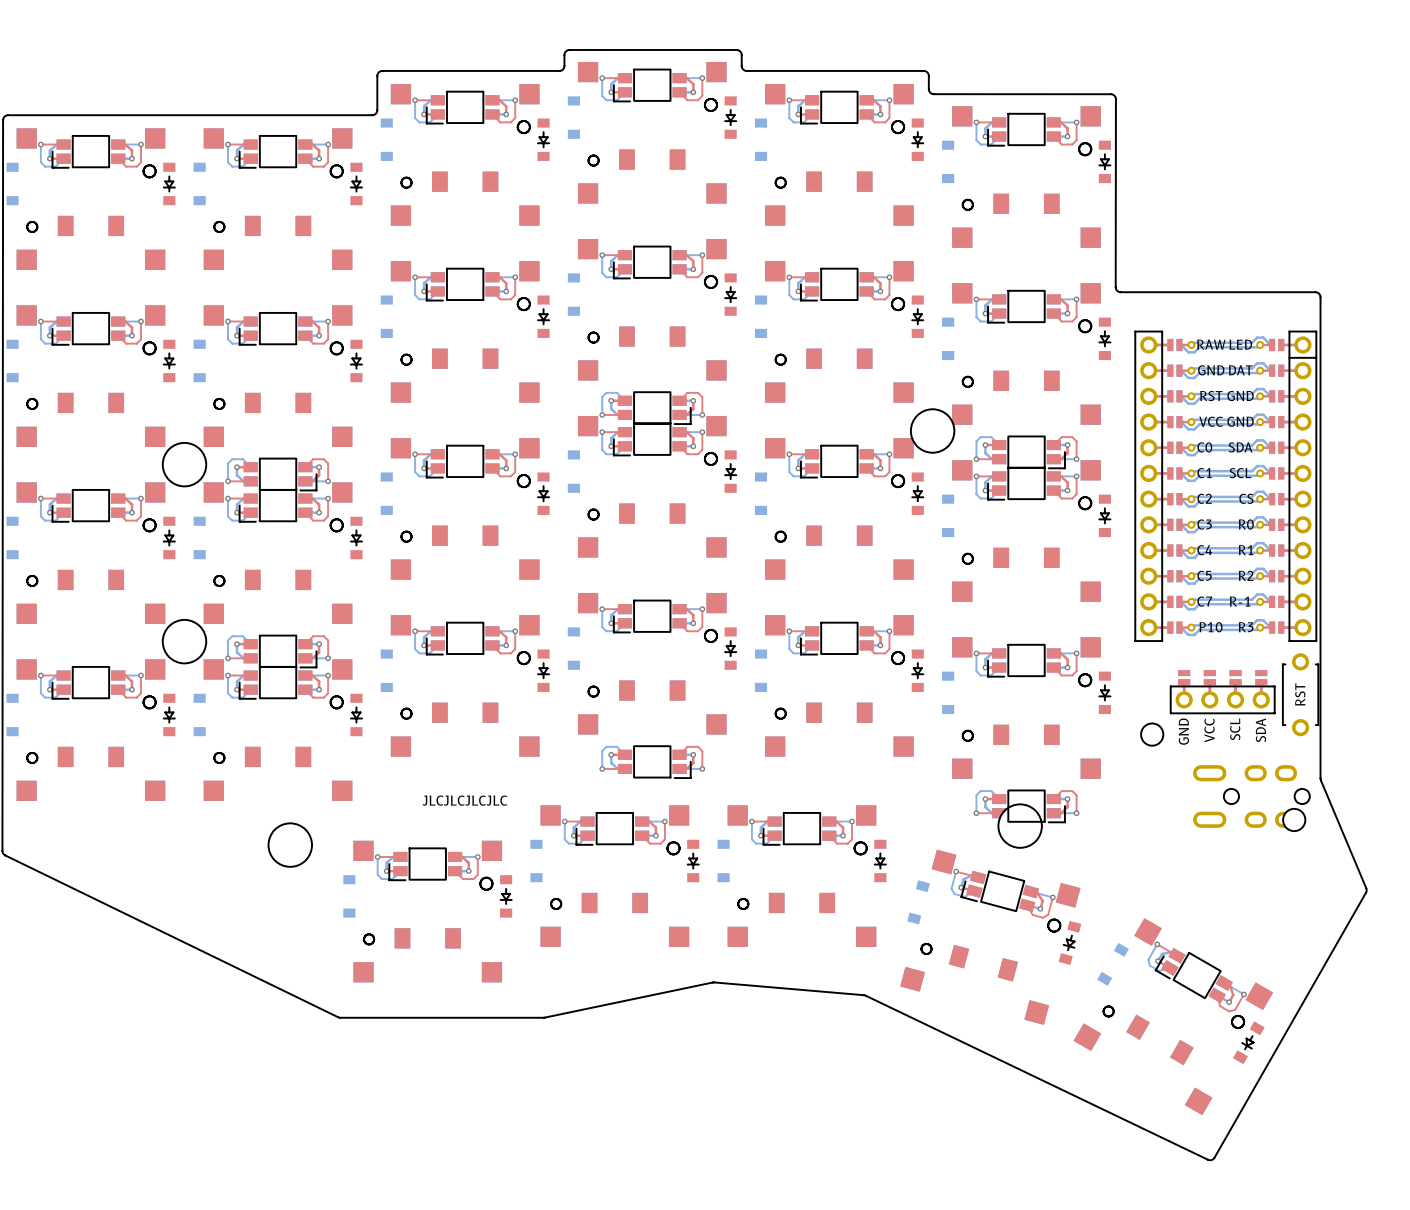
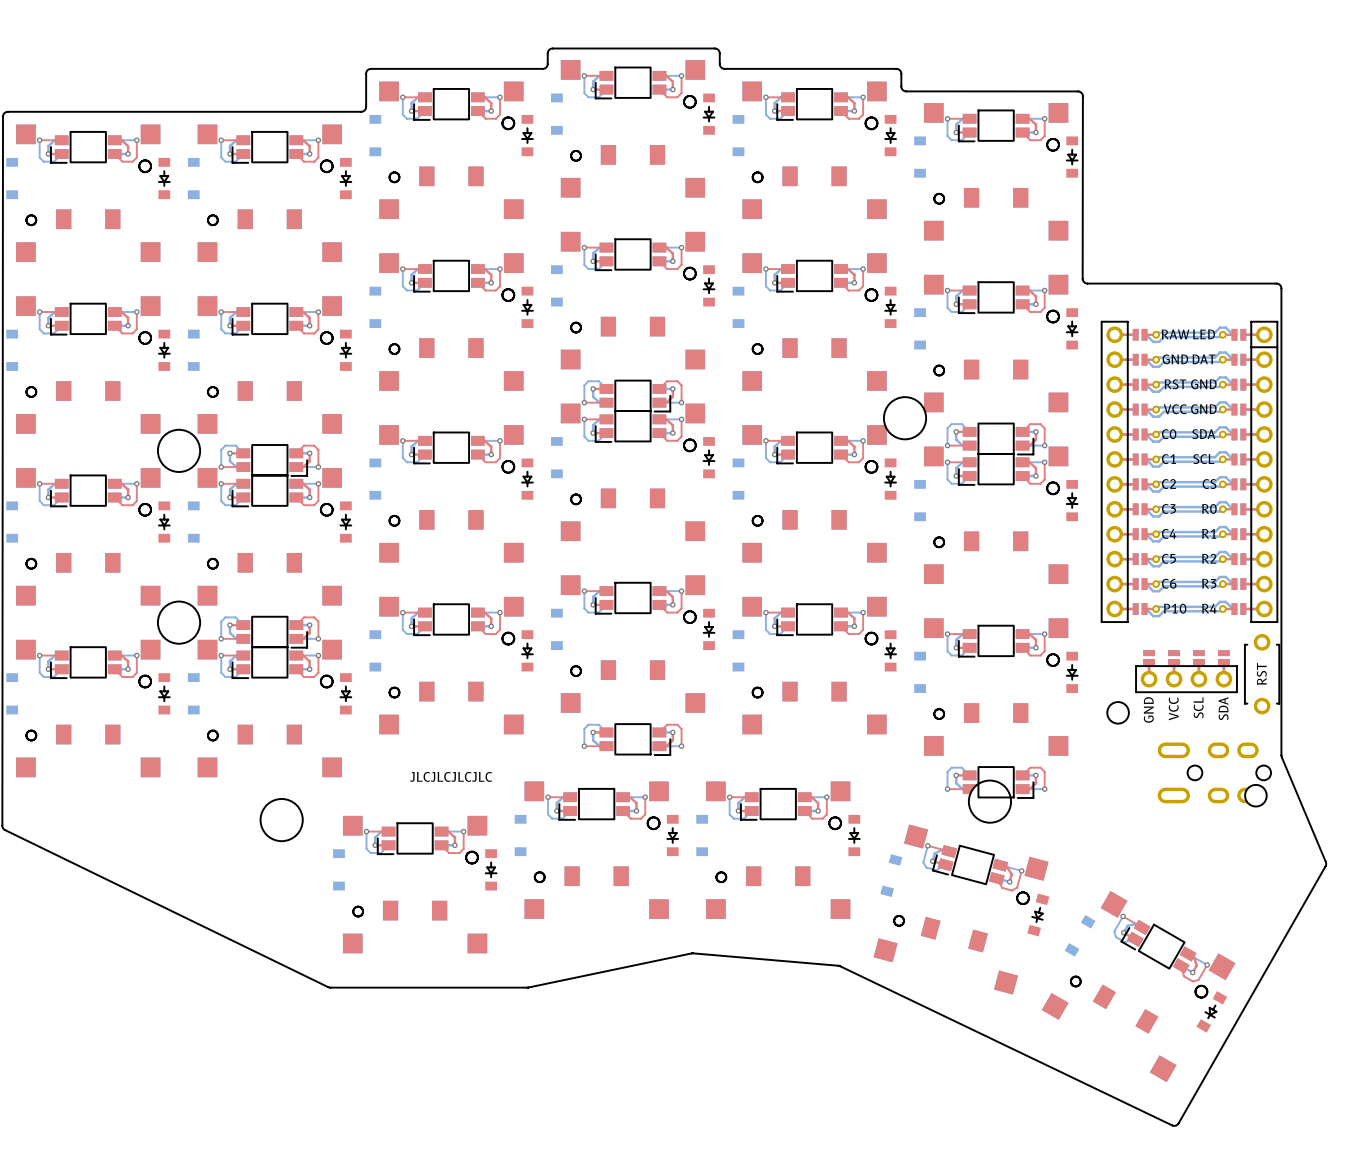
part text: C7 (1204, 601) -> C6 (1169, 583)
part text: R-1 (1240, 601) -> none
part text: none -> R3 (1209, 583)
part text: R3 (1246, 627) -> R4 (1209, 608)

